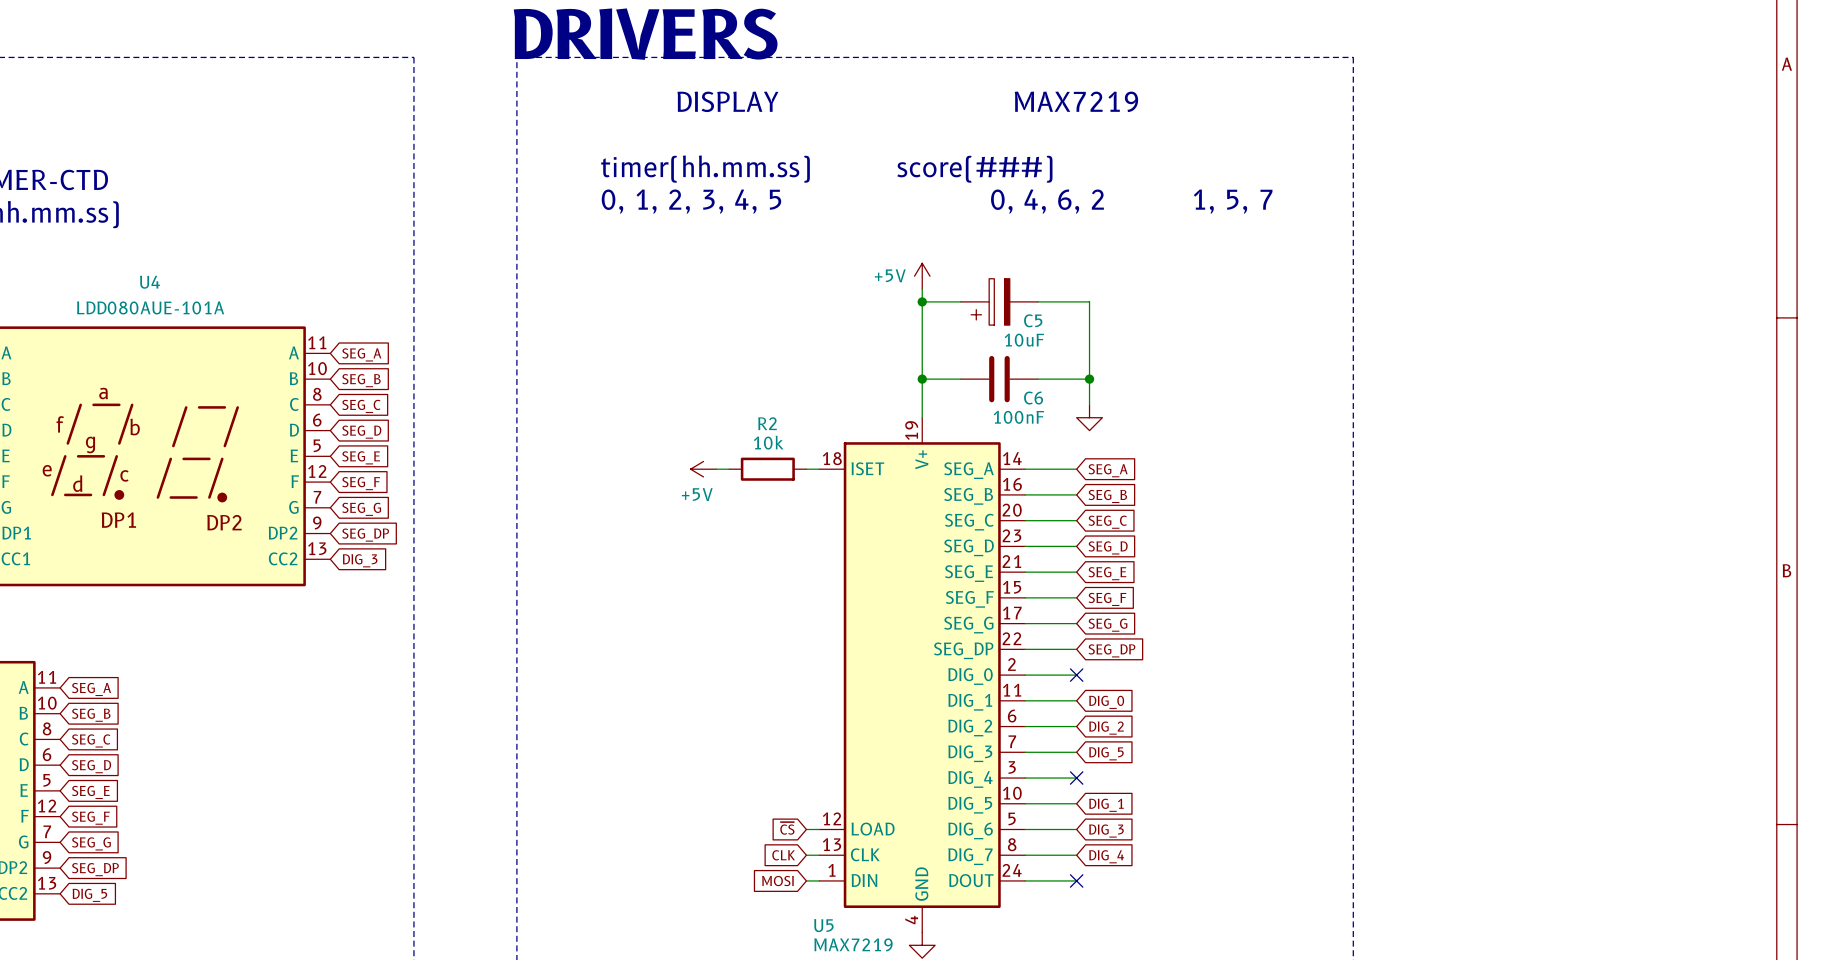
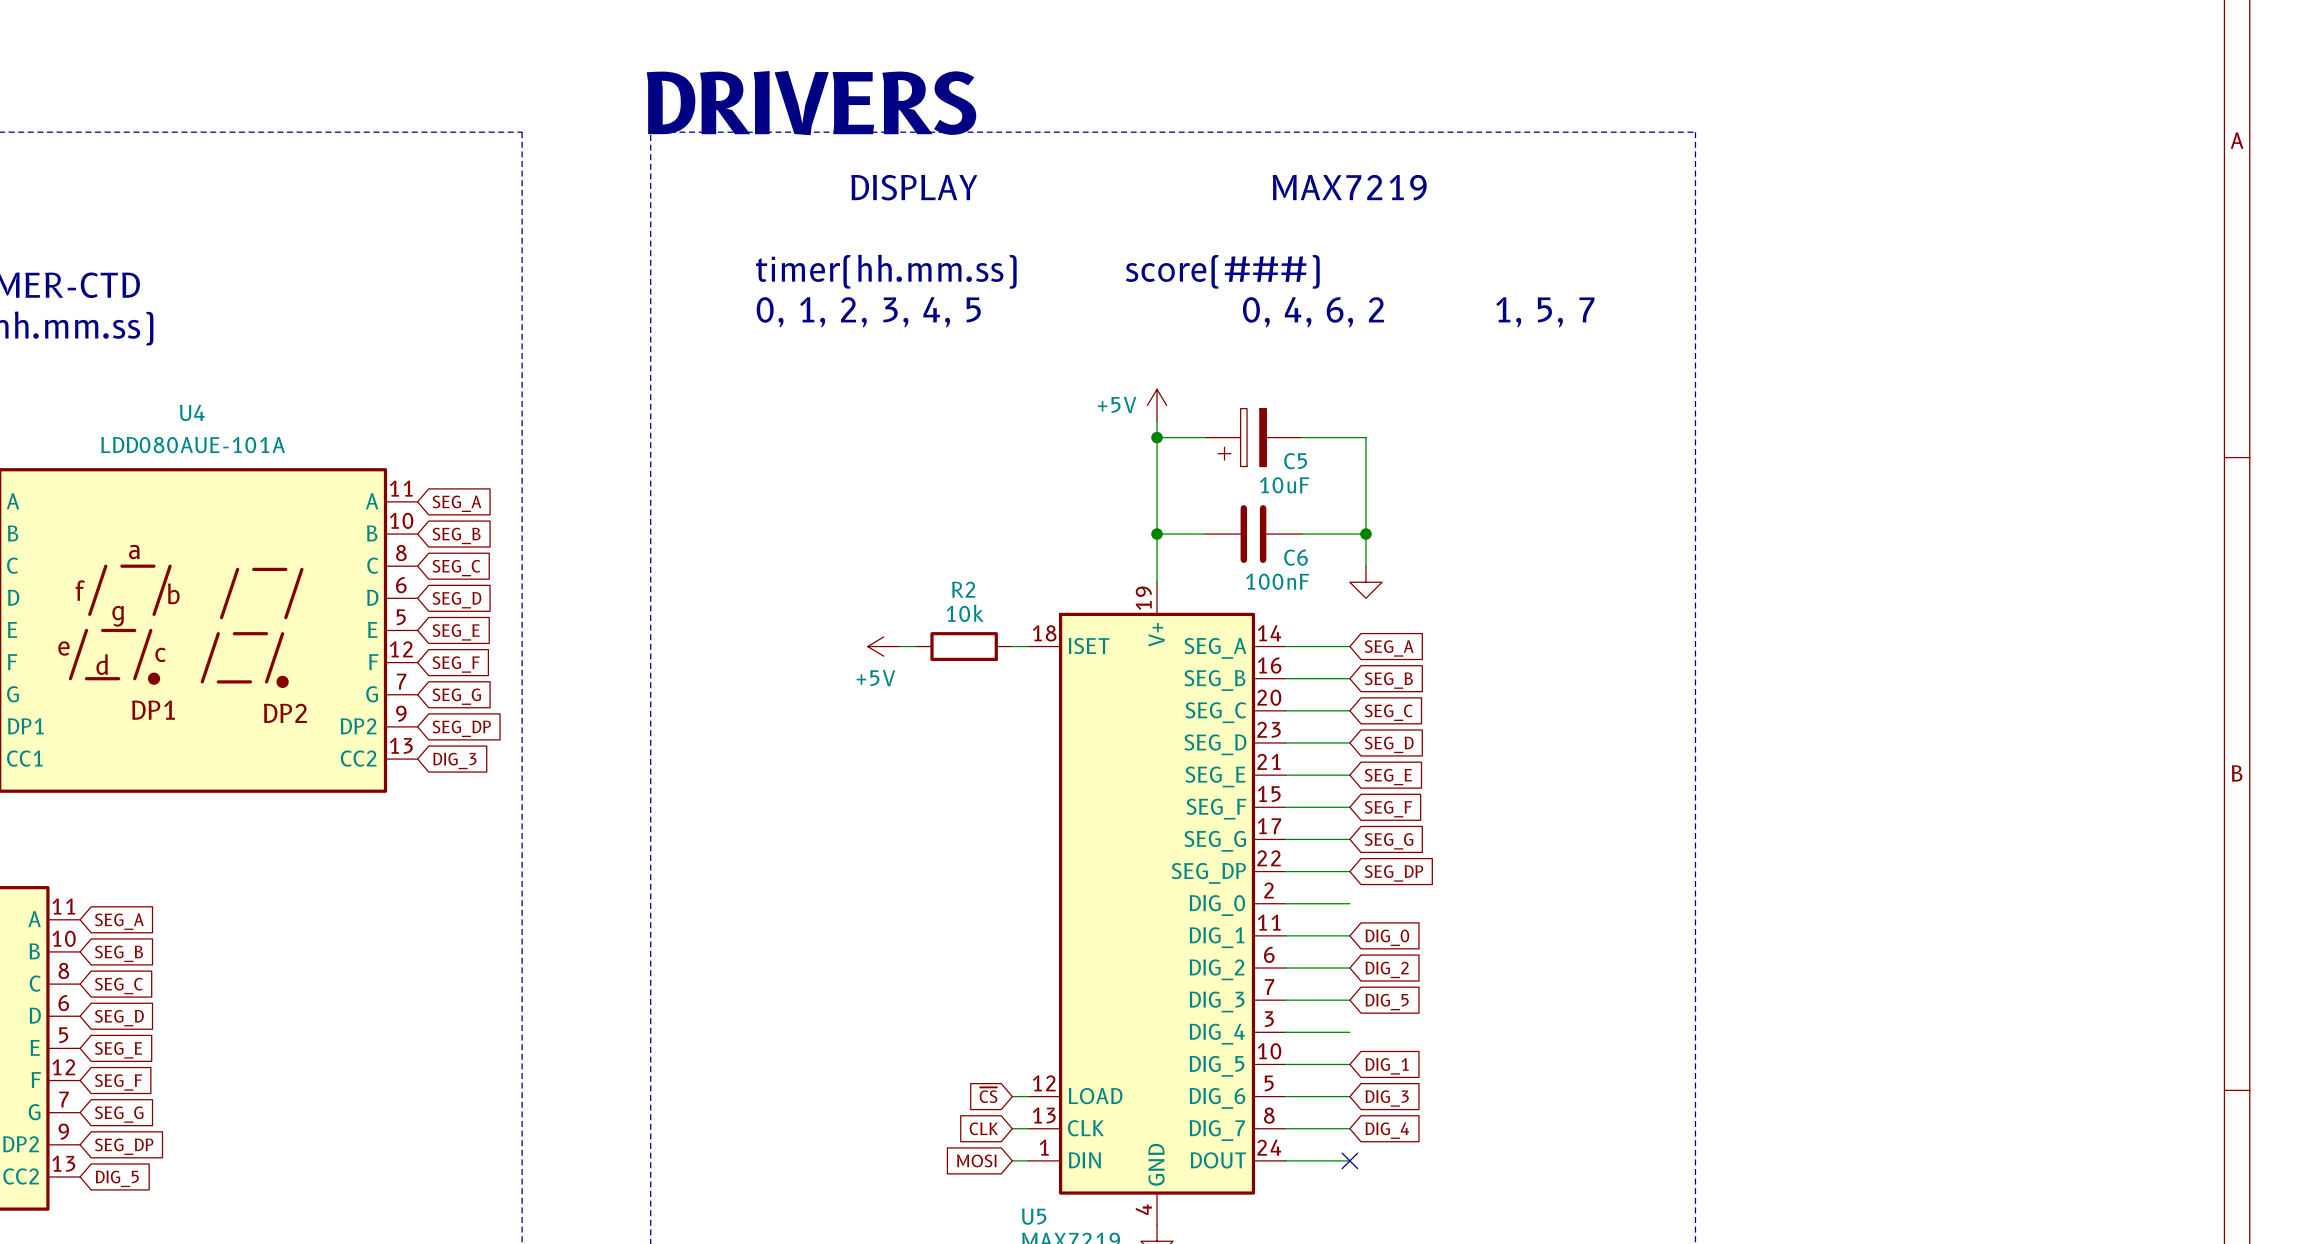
no-connect mark: (1076, 675) -> none
no-connect mark: (1076, 778) -> none

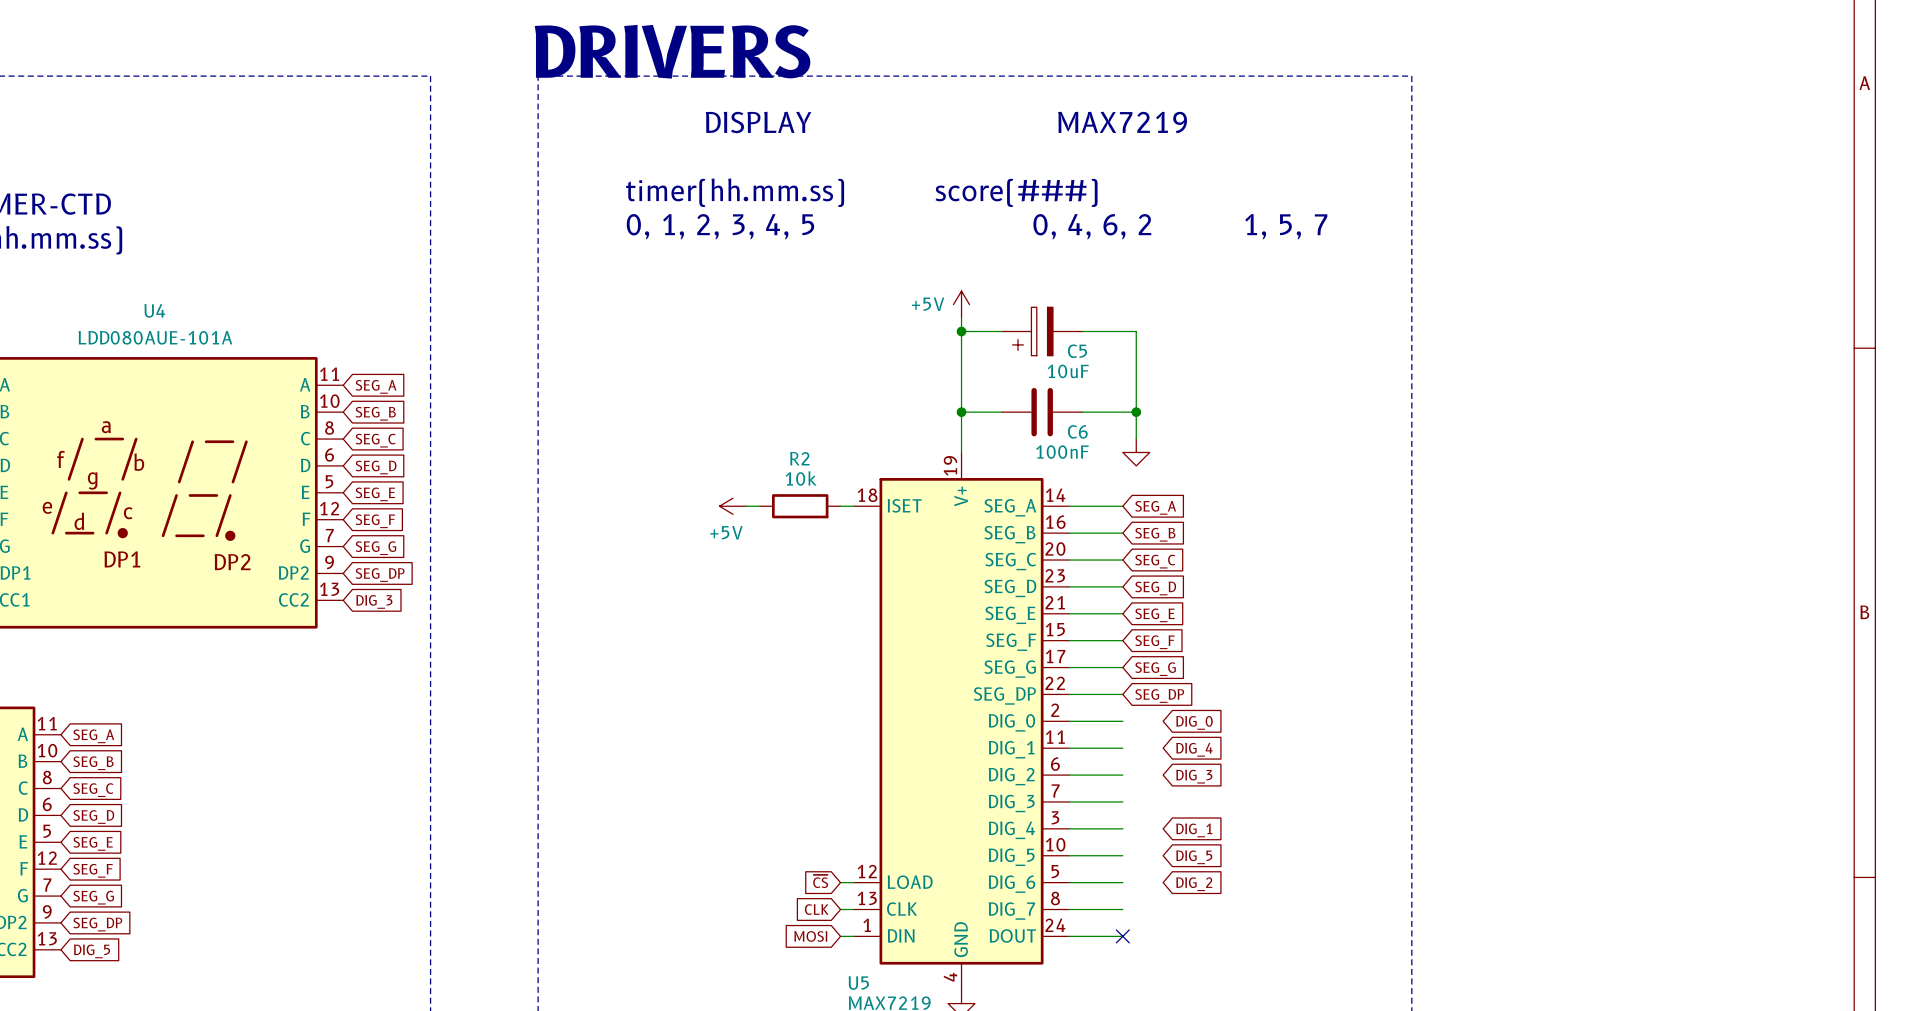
global label position: DIG_0 (1387, 937) -> DIG_0 (1194, 722)
global label position: DIG_2 (1387, 969) -> DIG_2 (1194, 884)
global label position: DIG_5 (1387, 1002) -> DIG_5 (1194, 857)
global label position: DIG_1 (1387, 1066) -> DIG_1 (1194, 830)
global label position: DIG_3 (1387, 1098) -> DIG_3 (1194, 776)
global label position: DIG_4 (1387, 1130) -> DIG_4 (1194, 749)

